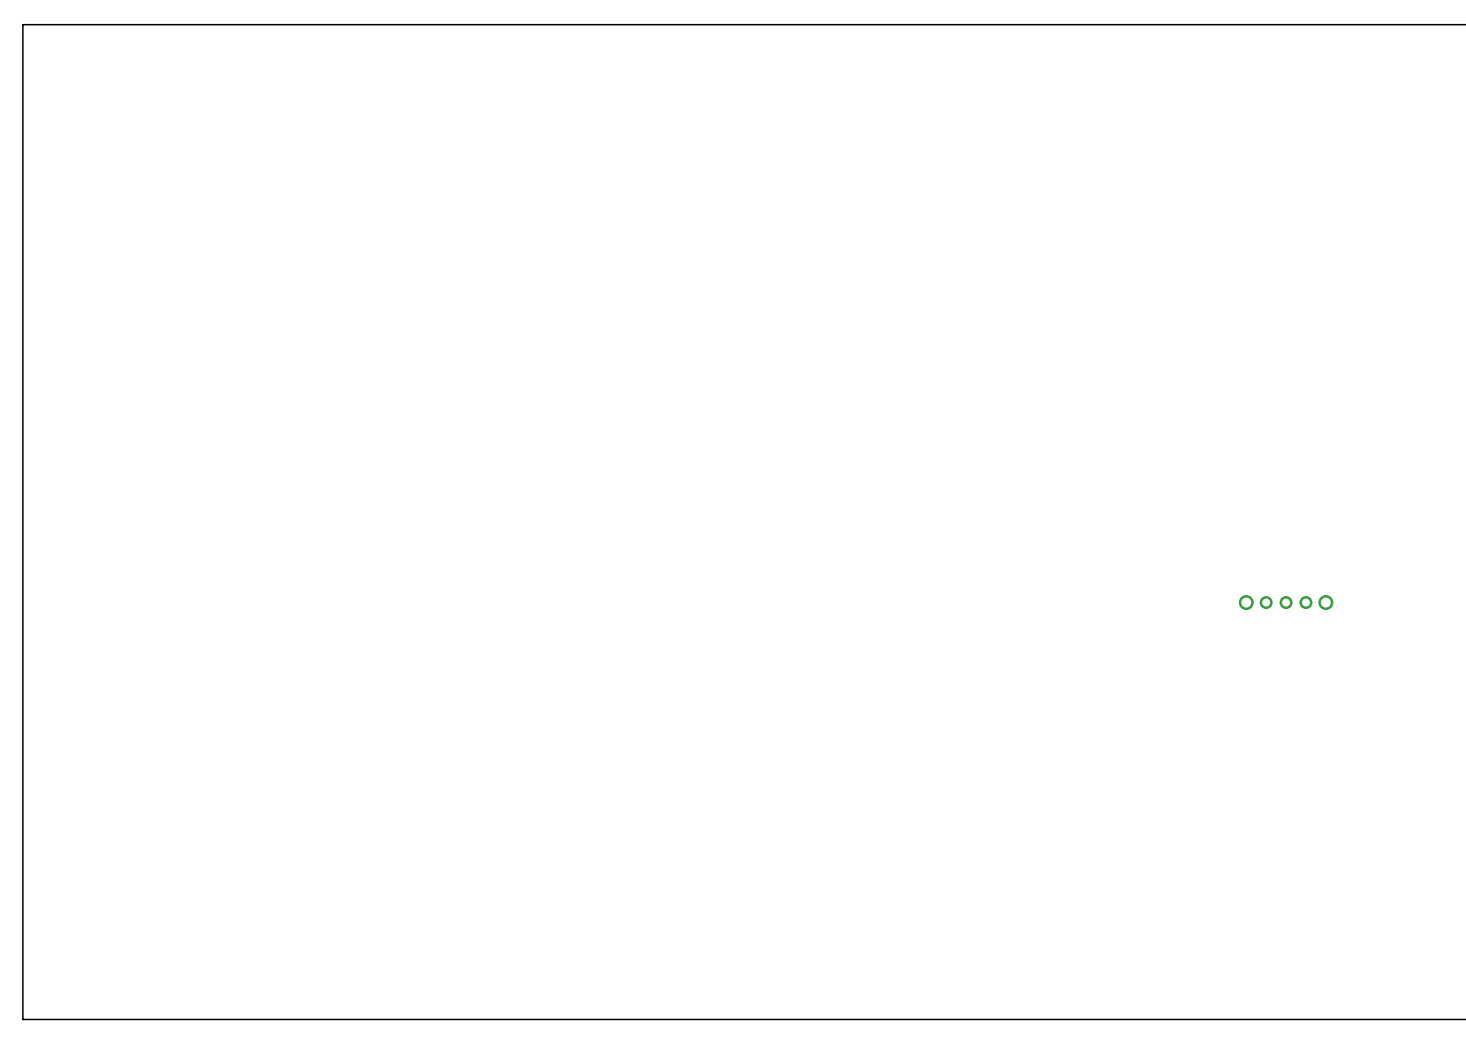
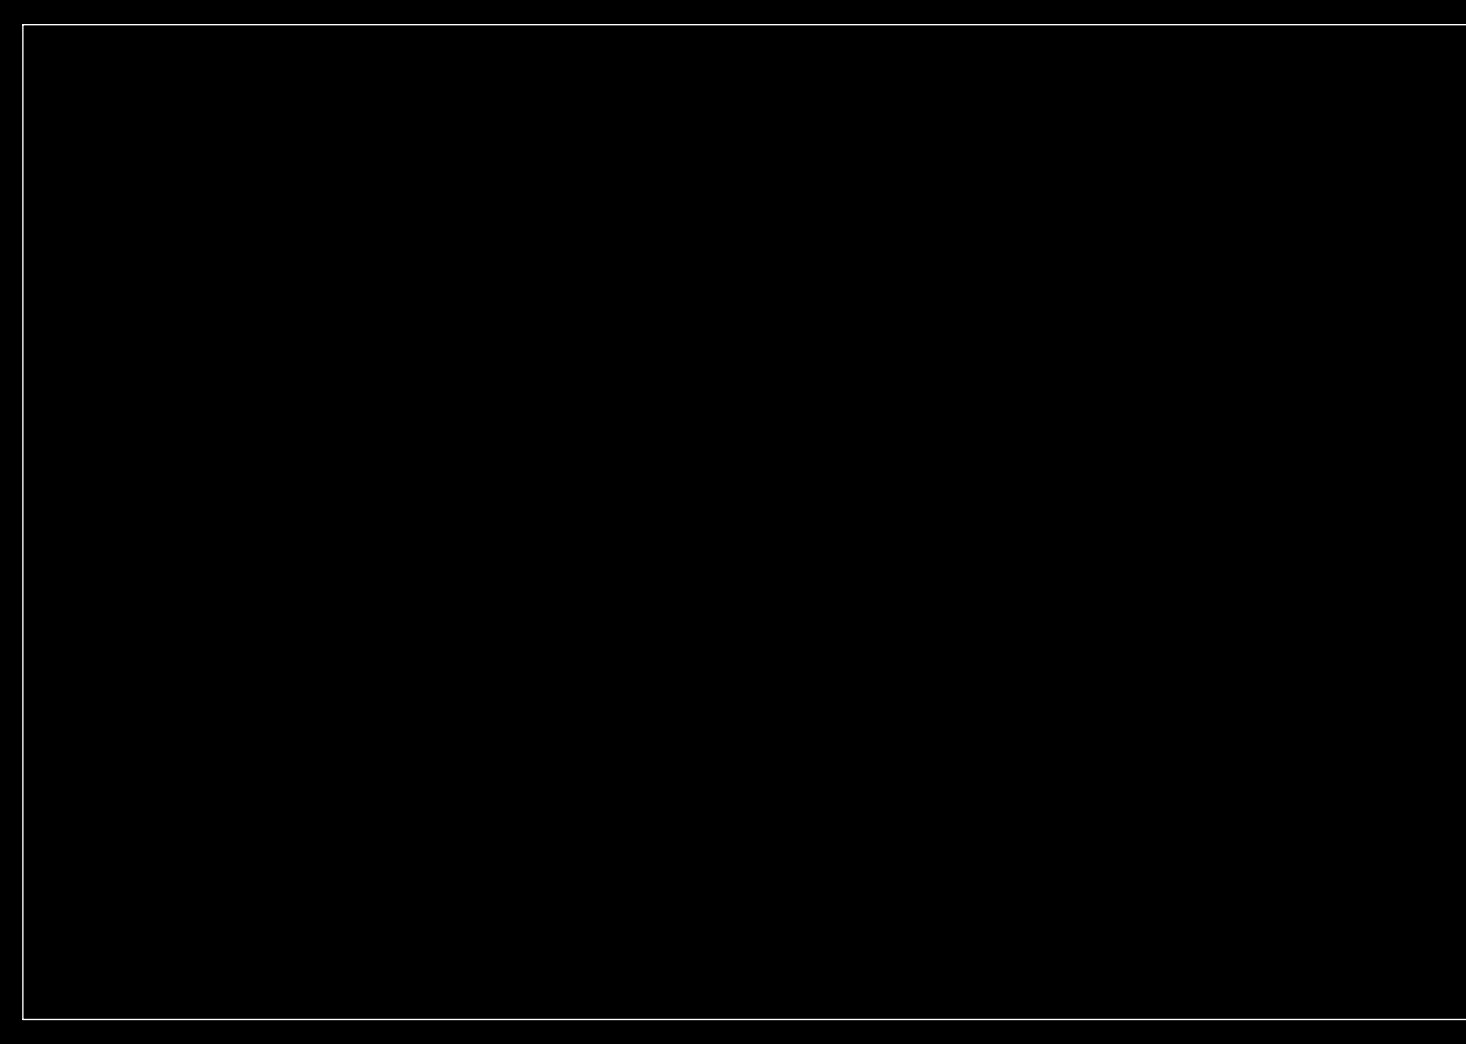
part: (1286, 602) -> none

